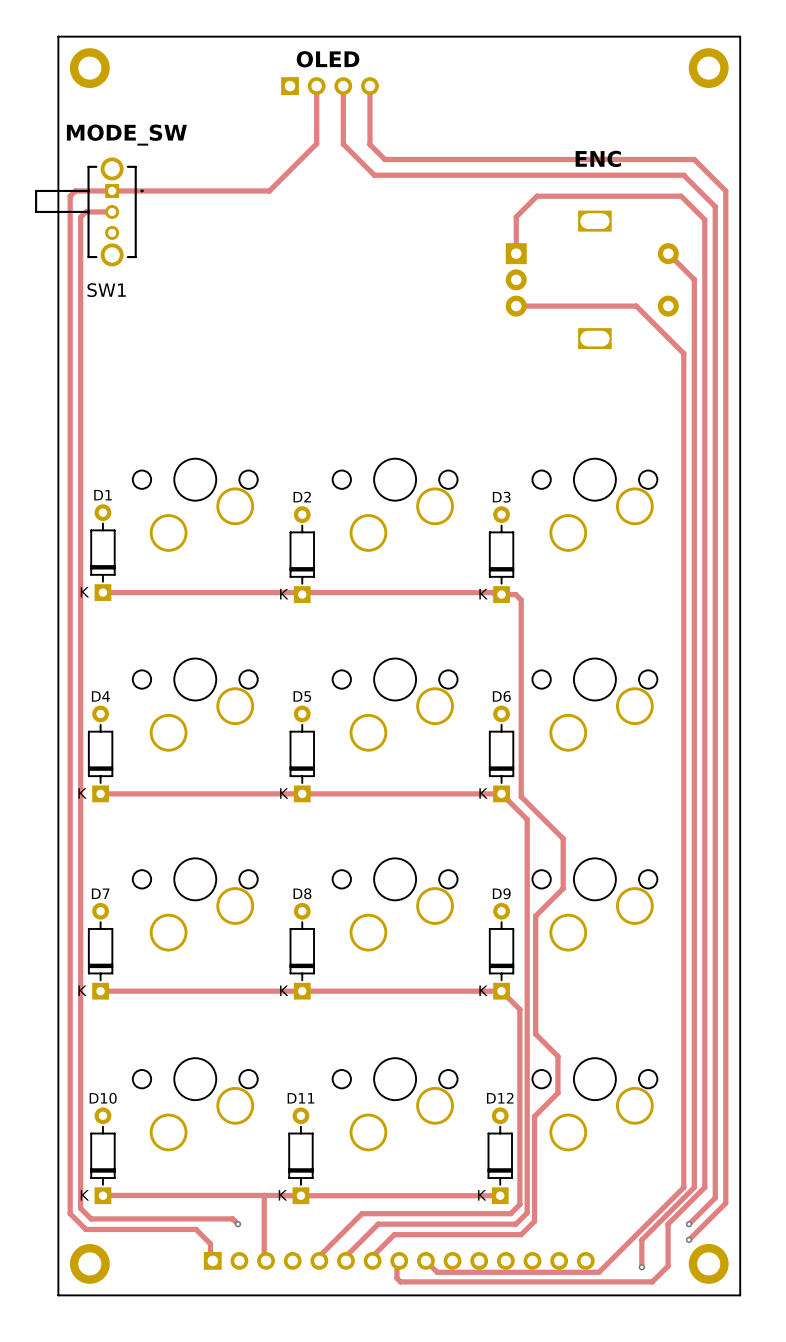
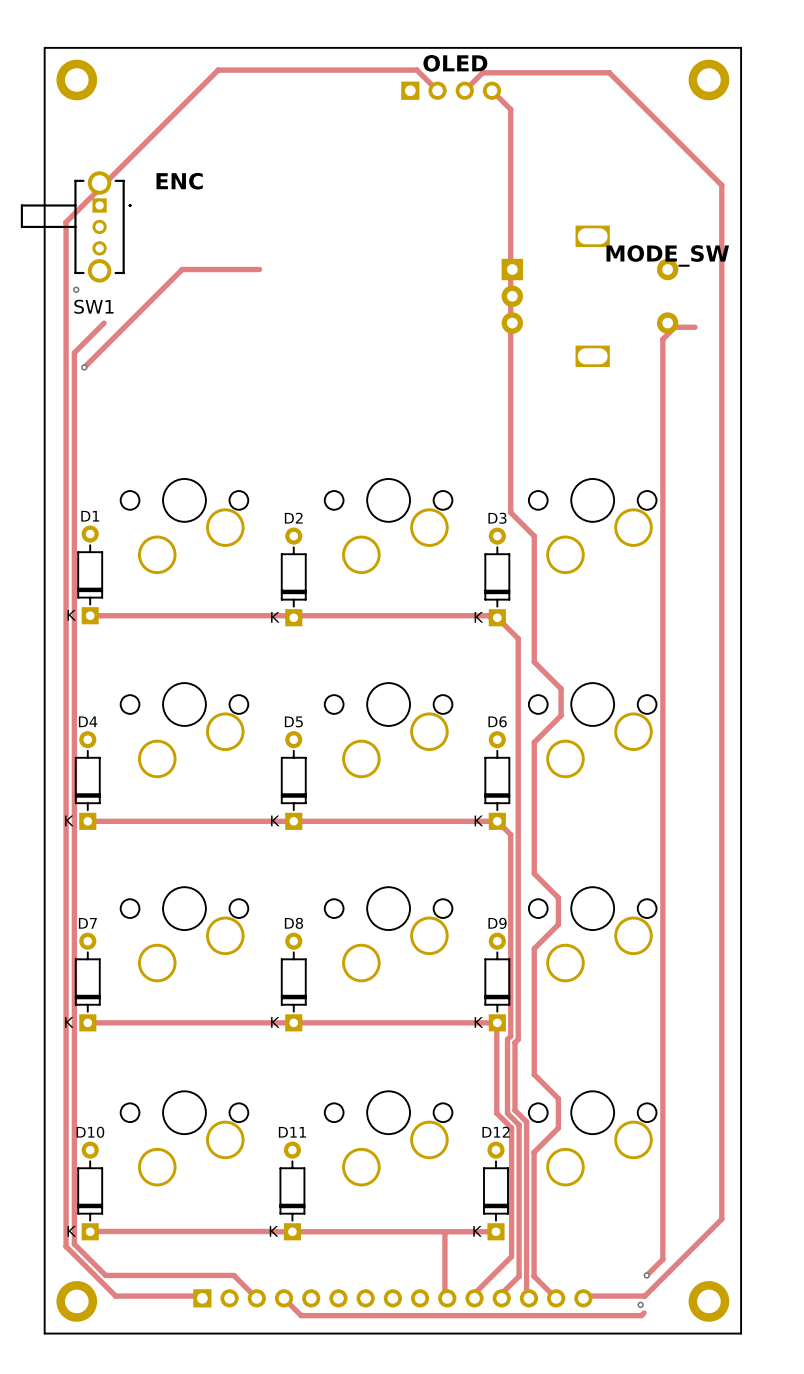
text position: OLED (328, 59) -> OLED (455, 63)
track: none -> (464, 90) (482, 72) (609, 72) (721, 185) (721, 1219) (644, 1296) (581, 1296)
track: none -> (491, 90) (510, 109) (510, 512) (534, 536) (534, 662) (561, 688) (561, 715) (534, 742) (534, 873) (558, 897) (558, 924) (534, 948) (534, 1074) (558, 1098) (558, 1128) (534, 1152) (534, 1276) (553, 1296)
track: (316, 86) (316, 143) (269, 190) (75, 190) (70, 196) (70, 1213) (85, 1229) (196, 1229) (210, 1243) (210, 1258) -> (437, 91) (416, 70) (218, 70) (66, 222) (66, 1246) (115, 1296) (200, 1296)
part position: (330, 86) -> (451, 90)
track: (343, 86) (343, 144) (374, 175) (683, 175) (715, 206) (715, 1197) (689, 1224) -> none
track: (369, 86) (369, 144) (384, 159) (694, 159) (725, 190) (725, 1203) (689, 1239) -> none
text: MODE_SW (126, 135) -> none
text: ENC (598, 158) -> none
text: none -> ENC (179, 181)
track: (112, 211) (85, 211) (80, 217) (80, 1208) (91, 1218) (232, 1218) (238, 1224) -> none
text: none -> MODE_SW (667, 255)
track: none -> (259, 269) (182, 269) (84, 367)
track: (516, 253) (516, 216) (536, 196) (681, 196) (704, 219) (704, 1187) (668, 1224) (668, 1266) (652, 1281) (400, 1281) (396, 1278) (396, 1258) -> none
track: (668, 253) (694, 279) (694, 1187) (641, 1239) (641, 1267) -> none
via: none -> (76, 289)
track: (516, 306) (636, 306) (683, 353) (683, 1187) (598, 1272) (437, 1272) (423, 1258) -> none
track: none -> (695, 327) (674, 327) (662, 339) (662, 1259) (646, 1275)
via: none -> (84, 367)
track: (501, 594) (515, 594) (521, 600) (521, 796) (563, 838) (563, 888) (535, 916) (535, 1034) (557, 1056) (557, 1093) (534, 1116) (534, 1221) (521, 1234) (394, 1234) (370, 1258) -> (497, 617) (518, 638) (518, 1039) (515, 1042) (515, 1110) (526, 1121) (526, 1296)
track: (514, 806) (527, 819) (527, 1212) (515, 1224) (378, 1224) (343, 1258) -> (510, 834) (510, 1036) (507, 1039) (507, 1113) (519, 1124) (519, 1276) (499, 1296)
track: (501, 991) (519, 1009) (519, 1204) (510, 1213) (362, 1213) (317, 1258) -> none
track: none -> (496, 1023) (496, 1113) (511, 1128) (511, 1256) (472, 1296)
track: (264, 1195) (263, 1258) -> (104, 323) (74, 352) (74, 1244) (105, 1275) (233, 1275) (254, 1296)
track: none -> (443, 1231) (444, 1233) (444, 1296)
via: (238, 1224) -> none
via: (689, 1224) -> none
via: none -> (646, 1275)
via: (689, 1239) -> none
track: none -> (281, 1296) (301, 1315) (641, 1315) (644, 1312)

